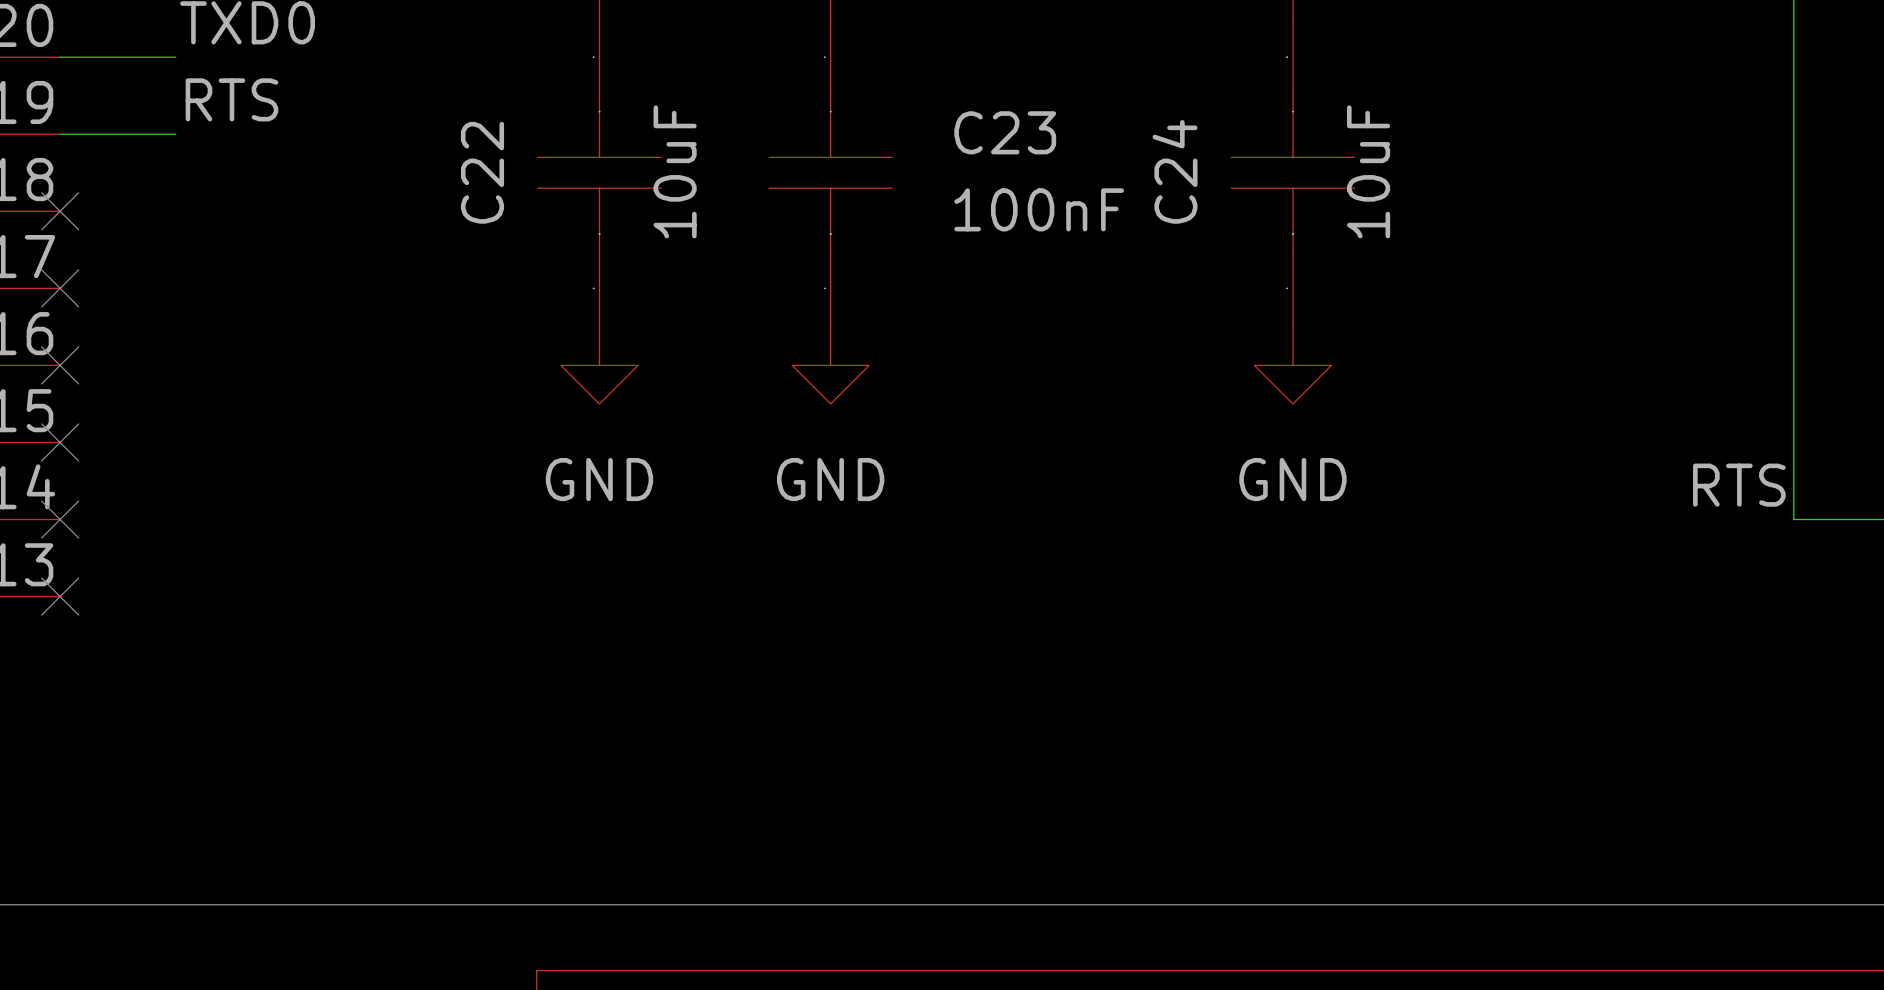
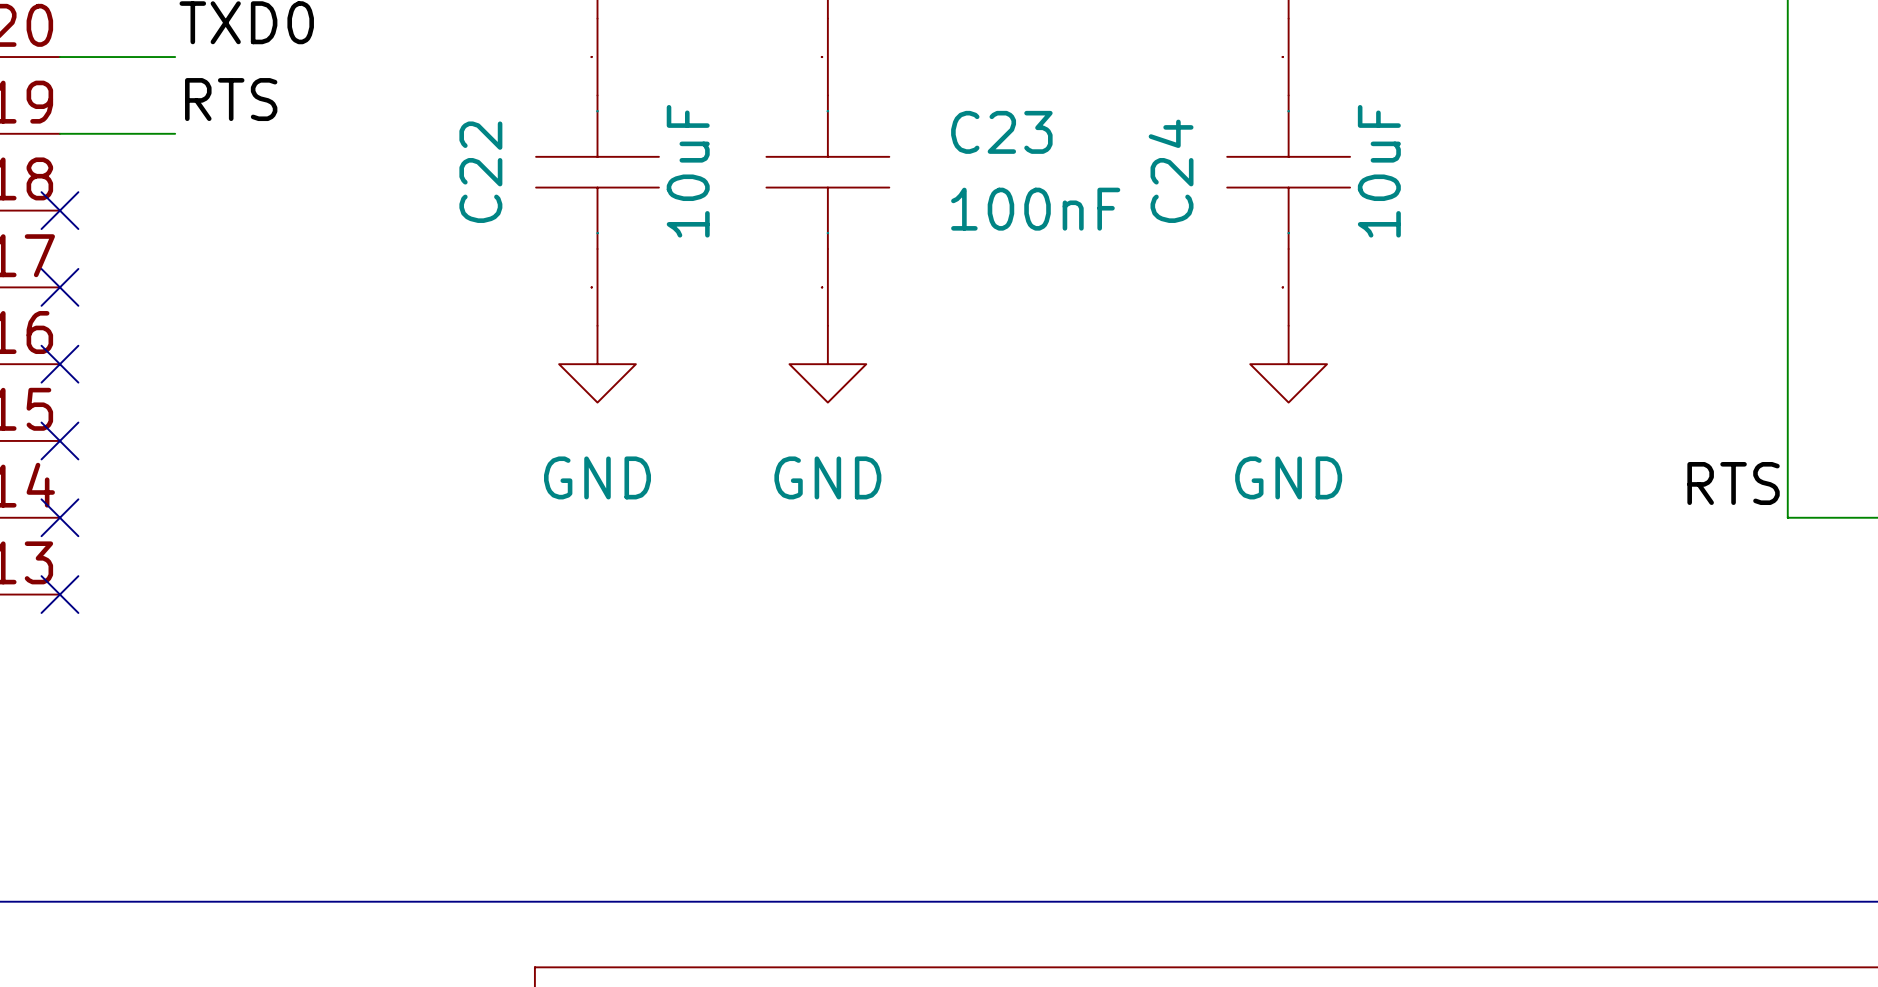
C22 value position: 10uF (675, 171) -> 10uF (688, 171)
C24 value position: 10uF (1368, 171) -> 10uF (1379, 171)

